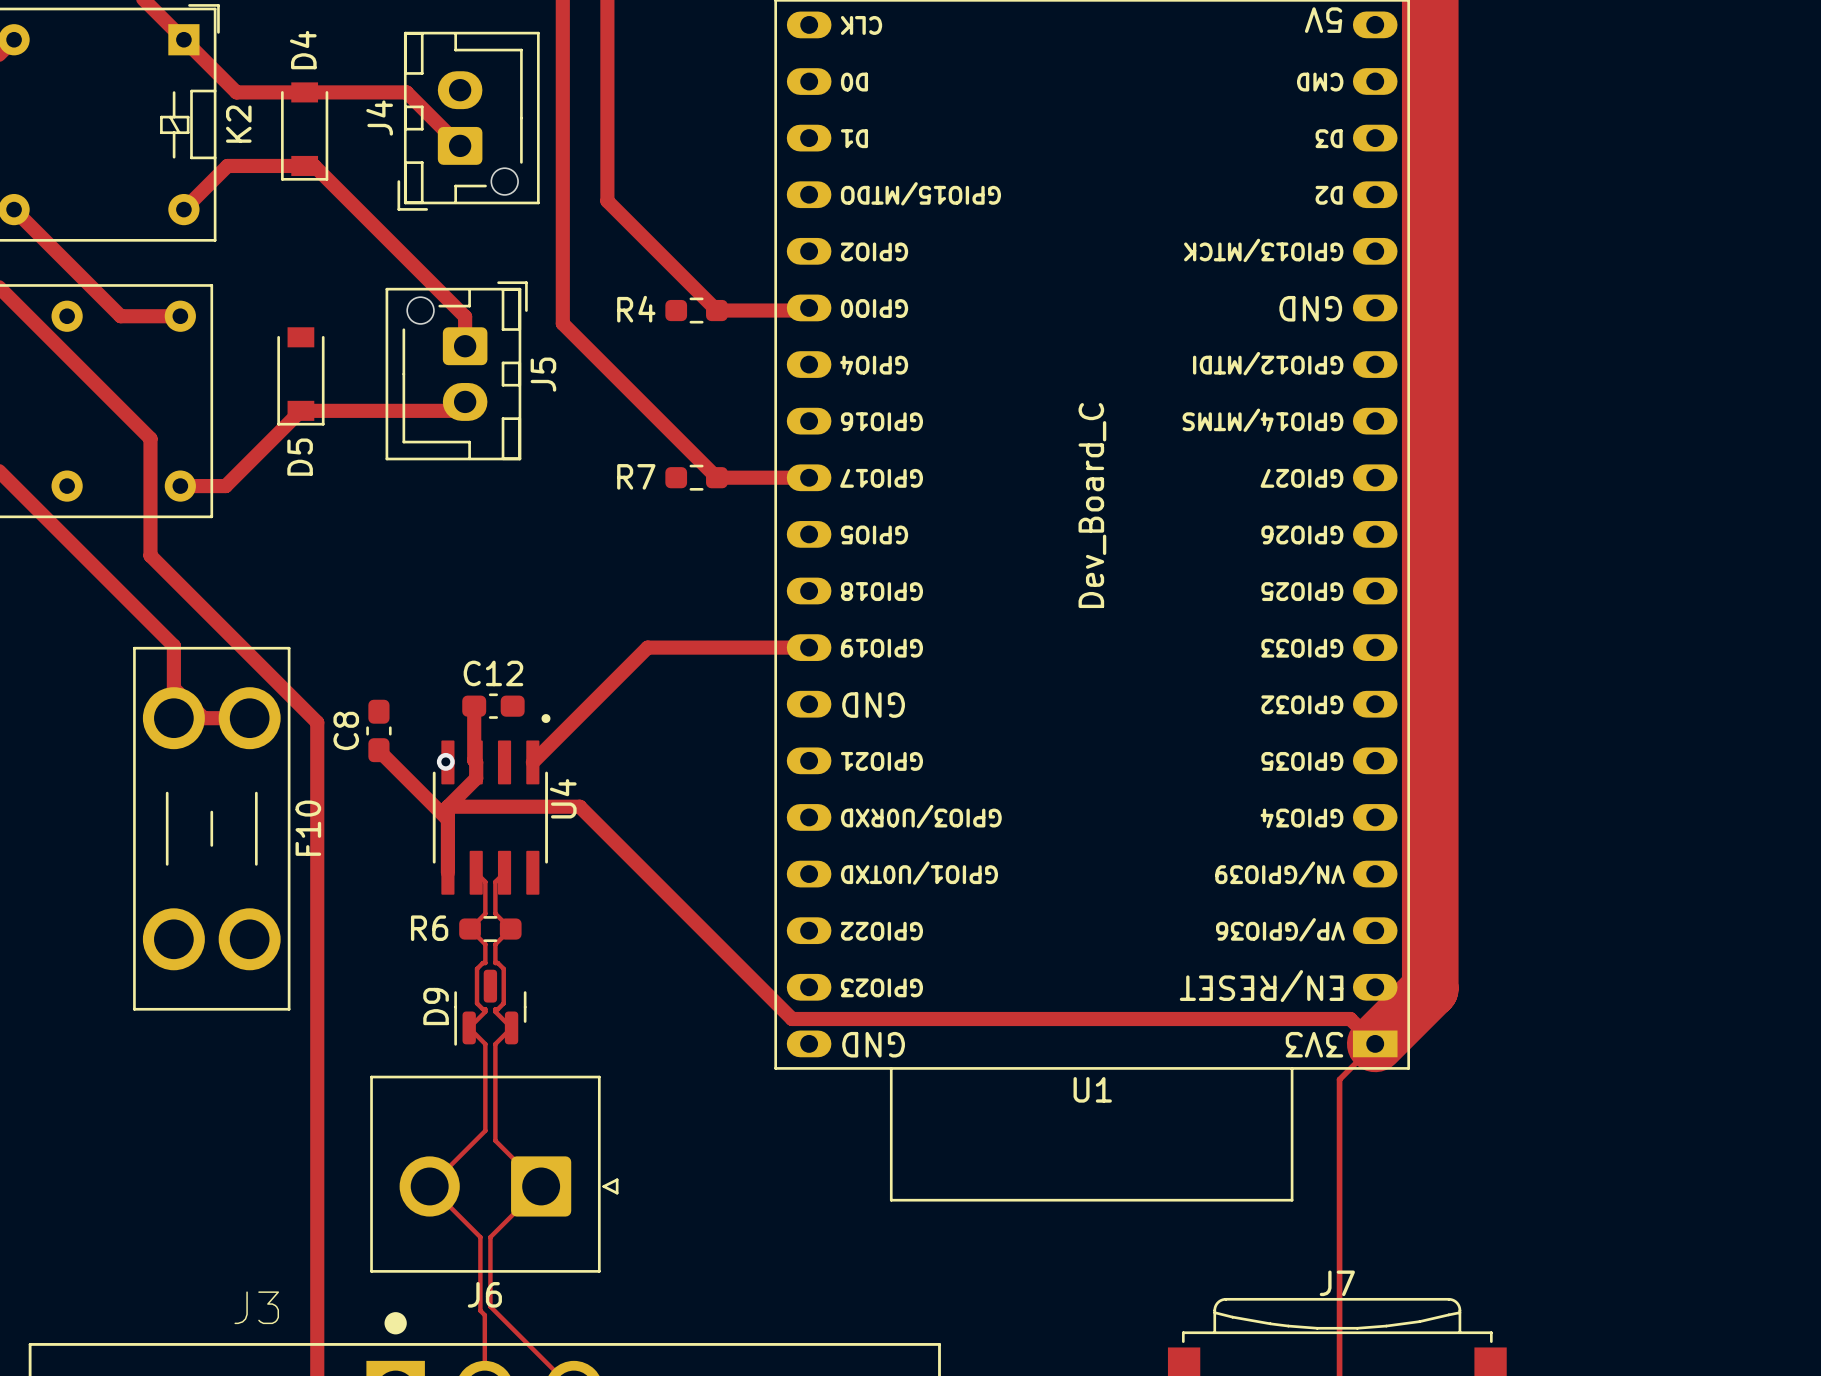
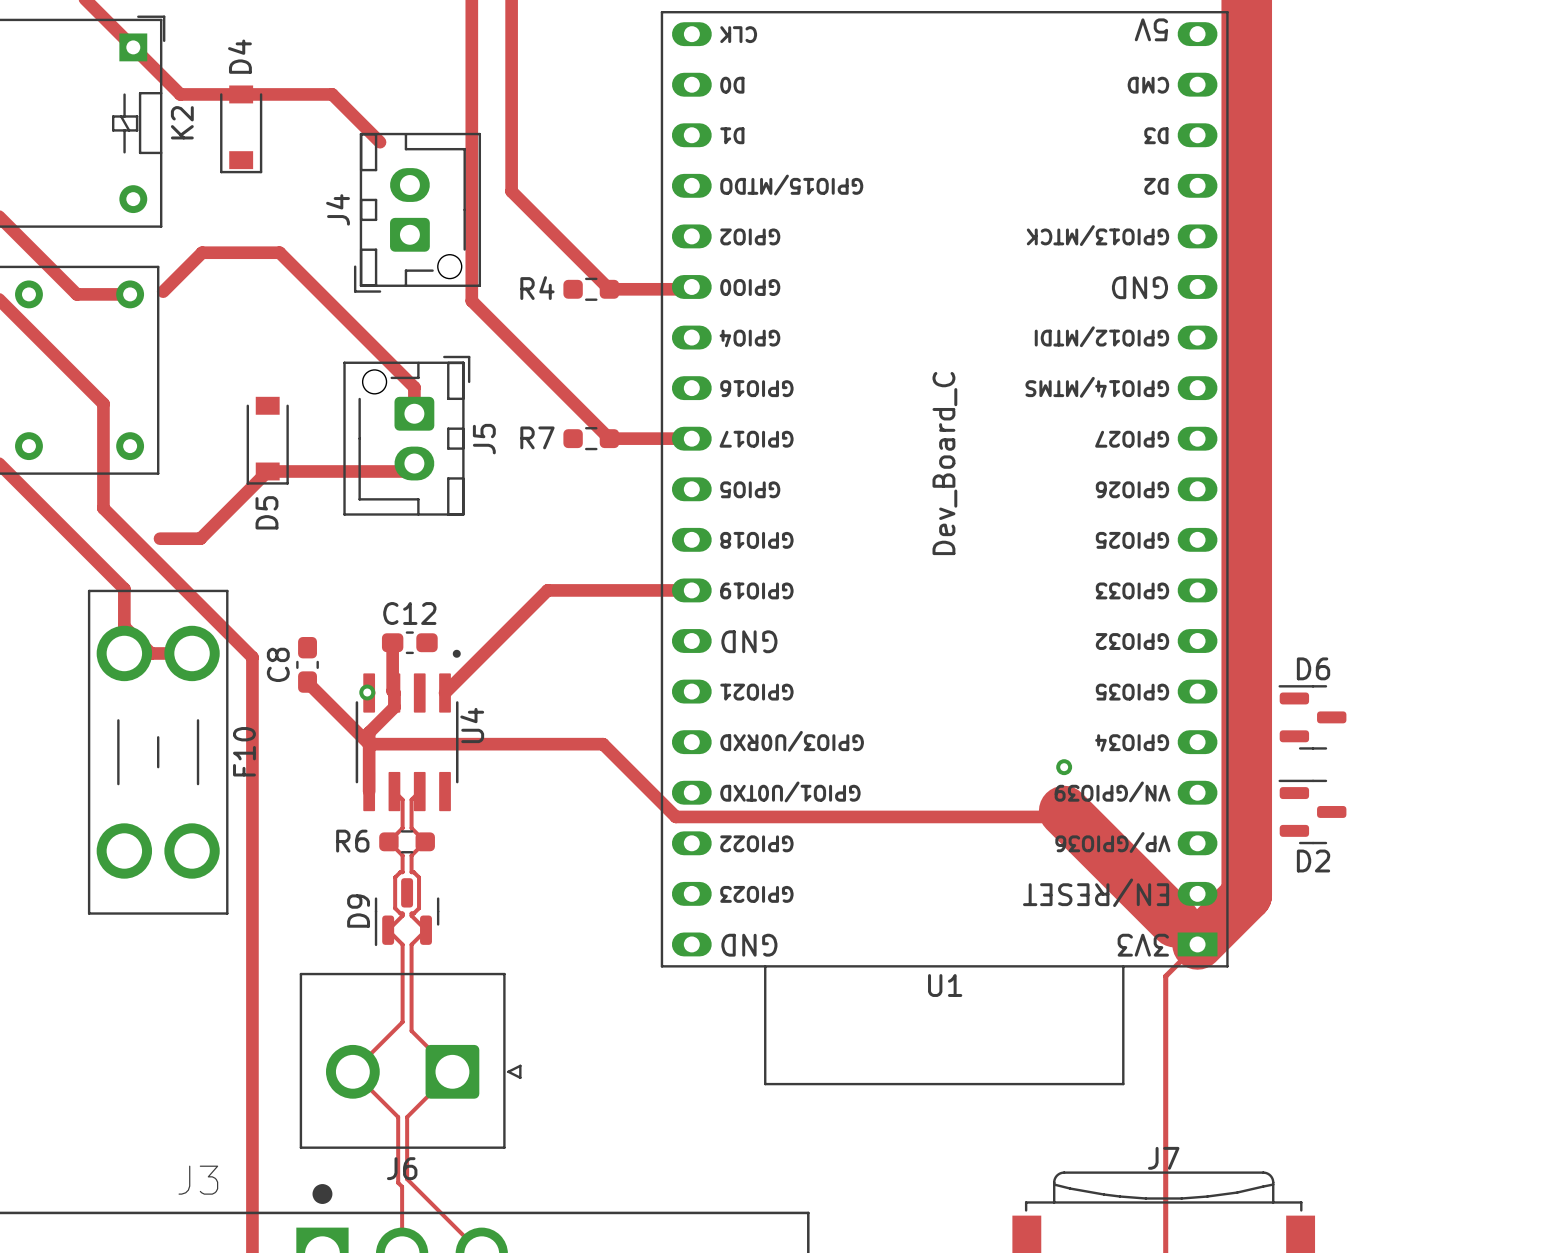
J4 position: (468, 121) -> (417, 212)
track: (183, 209) (227, 165) (314, 165) (465, 316) (465, 346) -> (163, 291) (202, 252) (279, 252) (414, 387) (414, 413)
J5 position: (456, 370) -> (406, 435)
D5 position: (300, 376) -> (267, 440)
track: (465, 401) (456, 410) (300, 410) (225, 486) (180, 486) -> (414, 463) (406, 471) (267, 471) (200, 538) (159, 538)
D6: none -> (1312, 717)
track: (447, 806) (579, 806) (792, 1019) (1350, 1019) -> (369, 744) (603, 744) (675, 816) (1058, 816) (1064, 811) (1175, 922)
via: none -> (1064, 767)
D2: none -> (1312, 811)

